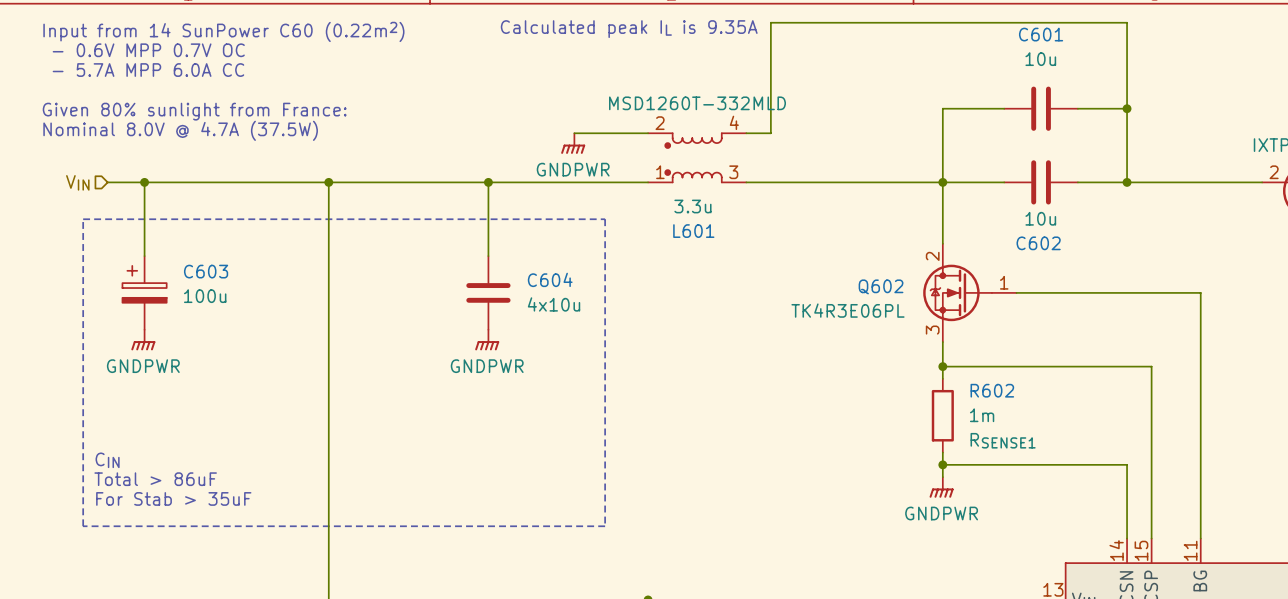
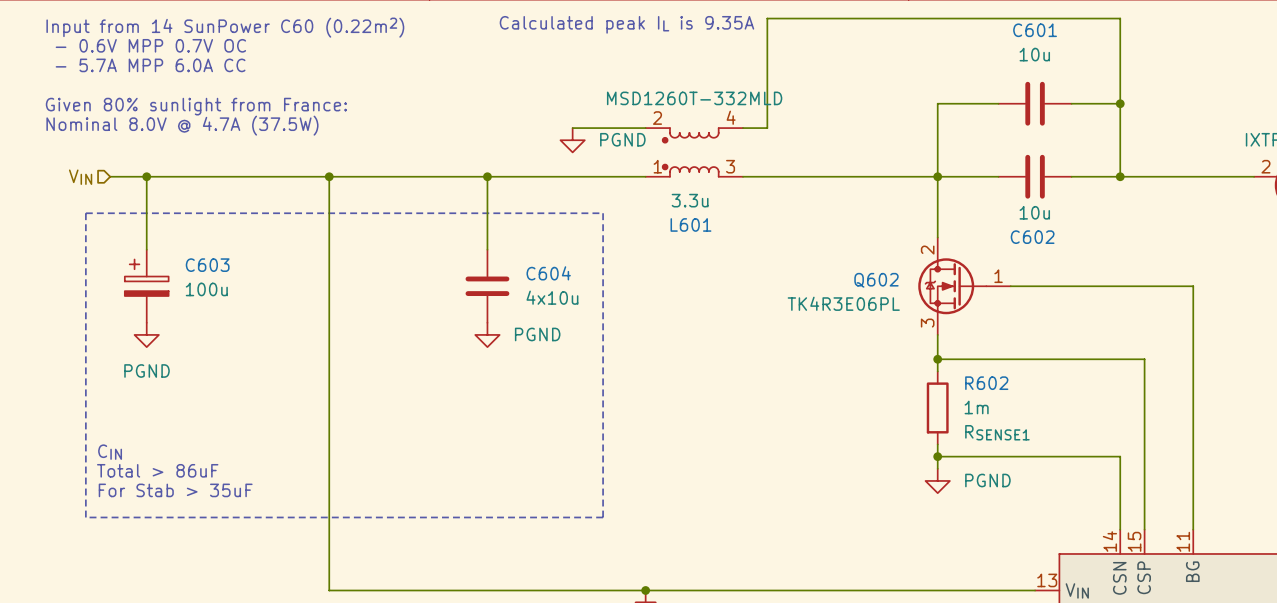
power symbol: GNDPWR (573, 143) -> PGND (572, 140)
power symbol: GNDPWR (143, 340) -> PGND (146, 334)
power symbol: GNDPWR (487, 340) -> PGND (487, 334)
power symbol: GNDPWR (941, 487) -> PGND (937, 480)

